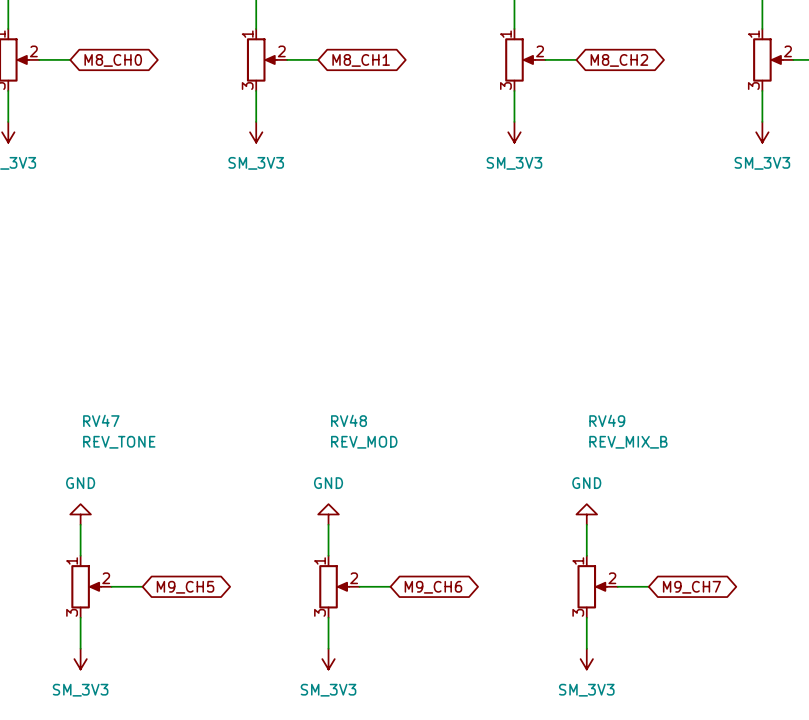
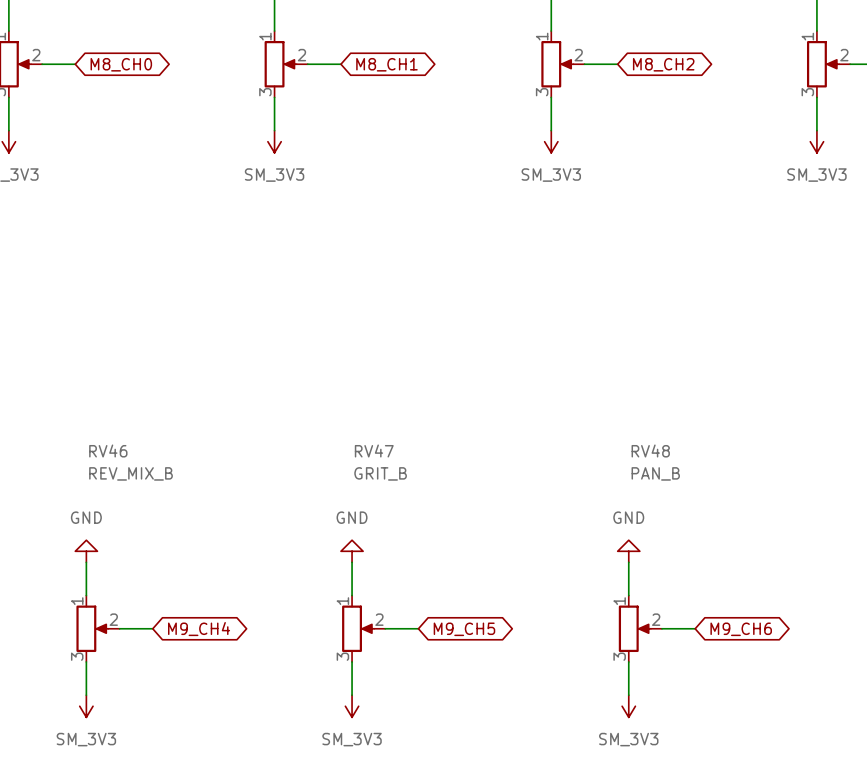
RV47 name: RV47 (101, 420) -> RV46 (108, 450)
RV48 name: RV48 (349, 420) -> RV47 (374, 450)
RV49 name: RV49 (607, 420) -> RV48 (650, 450)
RV47 value: REV_TONE (119, 442) -> REV_MIX_B (131, 473)
RV48 value: REV_MOD (364, 442) -> GRIT_B (380, 473)
RV49 value: REV_MIX_B (628, 442) -> PAN_B (655, 473)
global label: M9_CH5 (185, 587) -> M9_CH4 (199, 629)
global label: M9_CH6 (433, 587) -> M9_CH5 (464, 629)
global label: M9_CH7 (691, 587) -> M9_CH6 (741, 629)

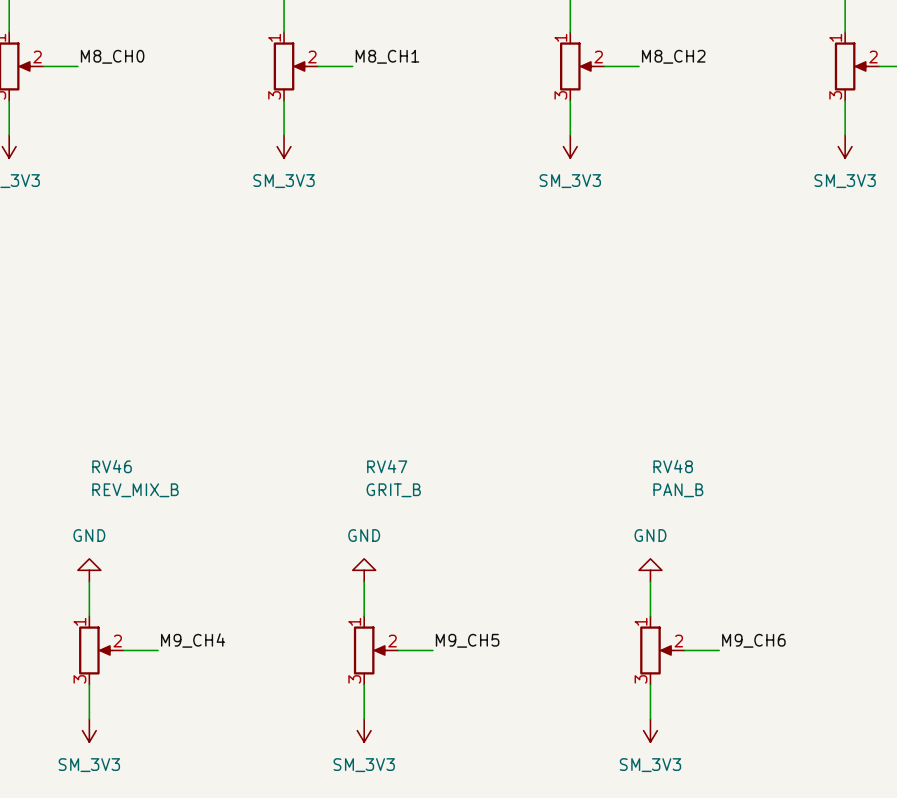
label: none -> M8_CH0 (112, 56)
label: none -> M8_CH1 (387, 56)
label: none -> M8_CH2 (673, 56)
global label: M8_CH0 (121, 64) -> none
global label: M8_CH1 (386, 64) -> none
global label: M8_CH2 (663, 64) -> none
label: none -> M9_CH4 (193, 640)
label: none -> M9_CH5 (467, 640)
label: none -> M9_CH6 (753, 640)
global label: M9_CH4 (199, 629) -> none
global label: M9_CH5 (464, 629) -> none
global label: M9_CH6 (741, 629) -> none

